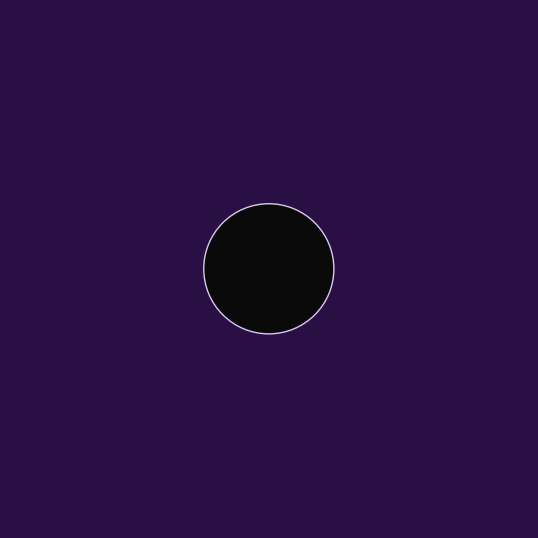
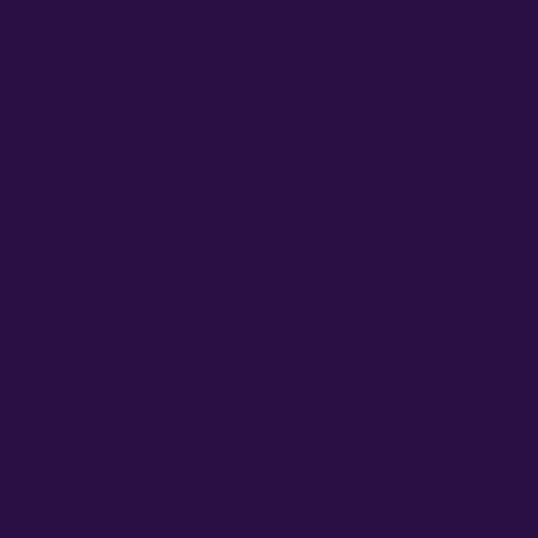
part: (268, 268) -> none

